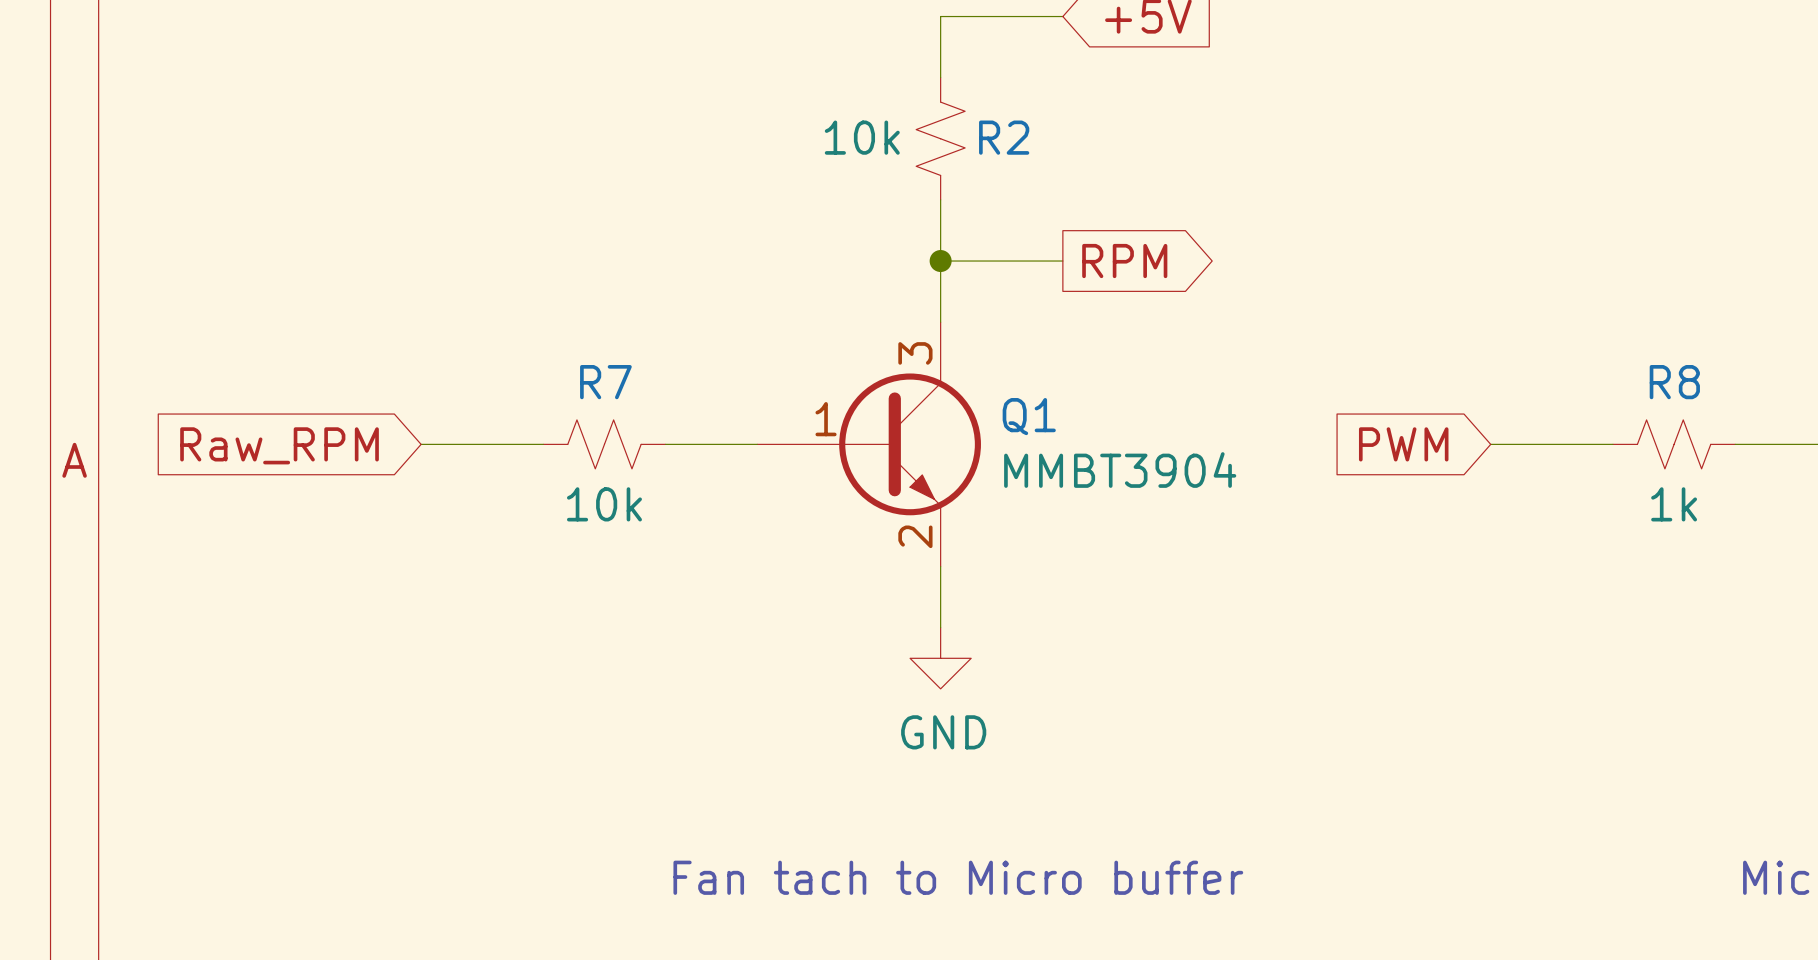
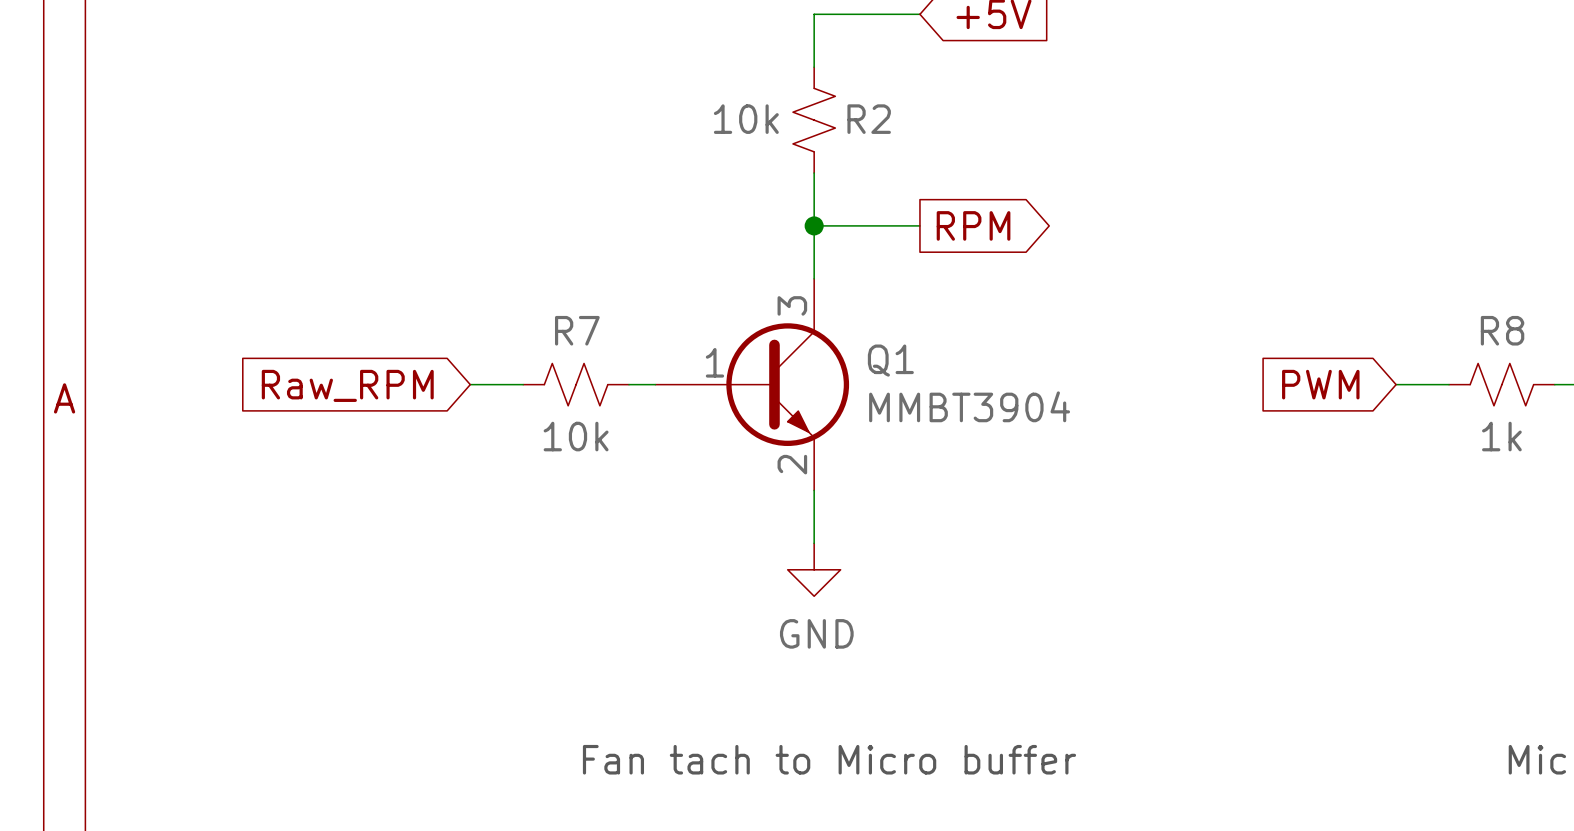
wire: (421, 444) (543, 444) -> (523, 384) (470, 384)
R7 position: (604, 444) -> (576, 384)
wire: (665, 444) (726, 444) -> none
global label position: PWM (1403, 444) -> PWM (1320, 384)
wire: (1490, 444) (1612, 444) -> (1449, 384) (1396, 384)
R8 position: (1674, 444) -> (1501, 384)
wire: (1735, 444) (1796, 444) -> none
global label position: Raw_RPM (279, 445) -> Raw_RPM (347, 385)

